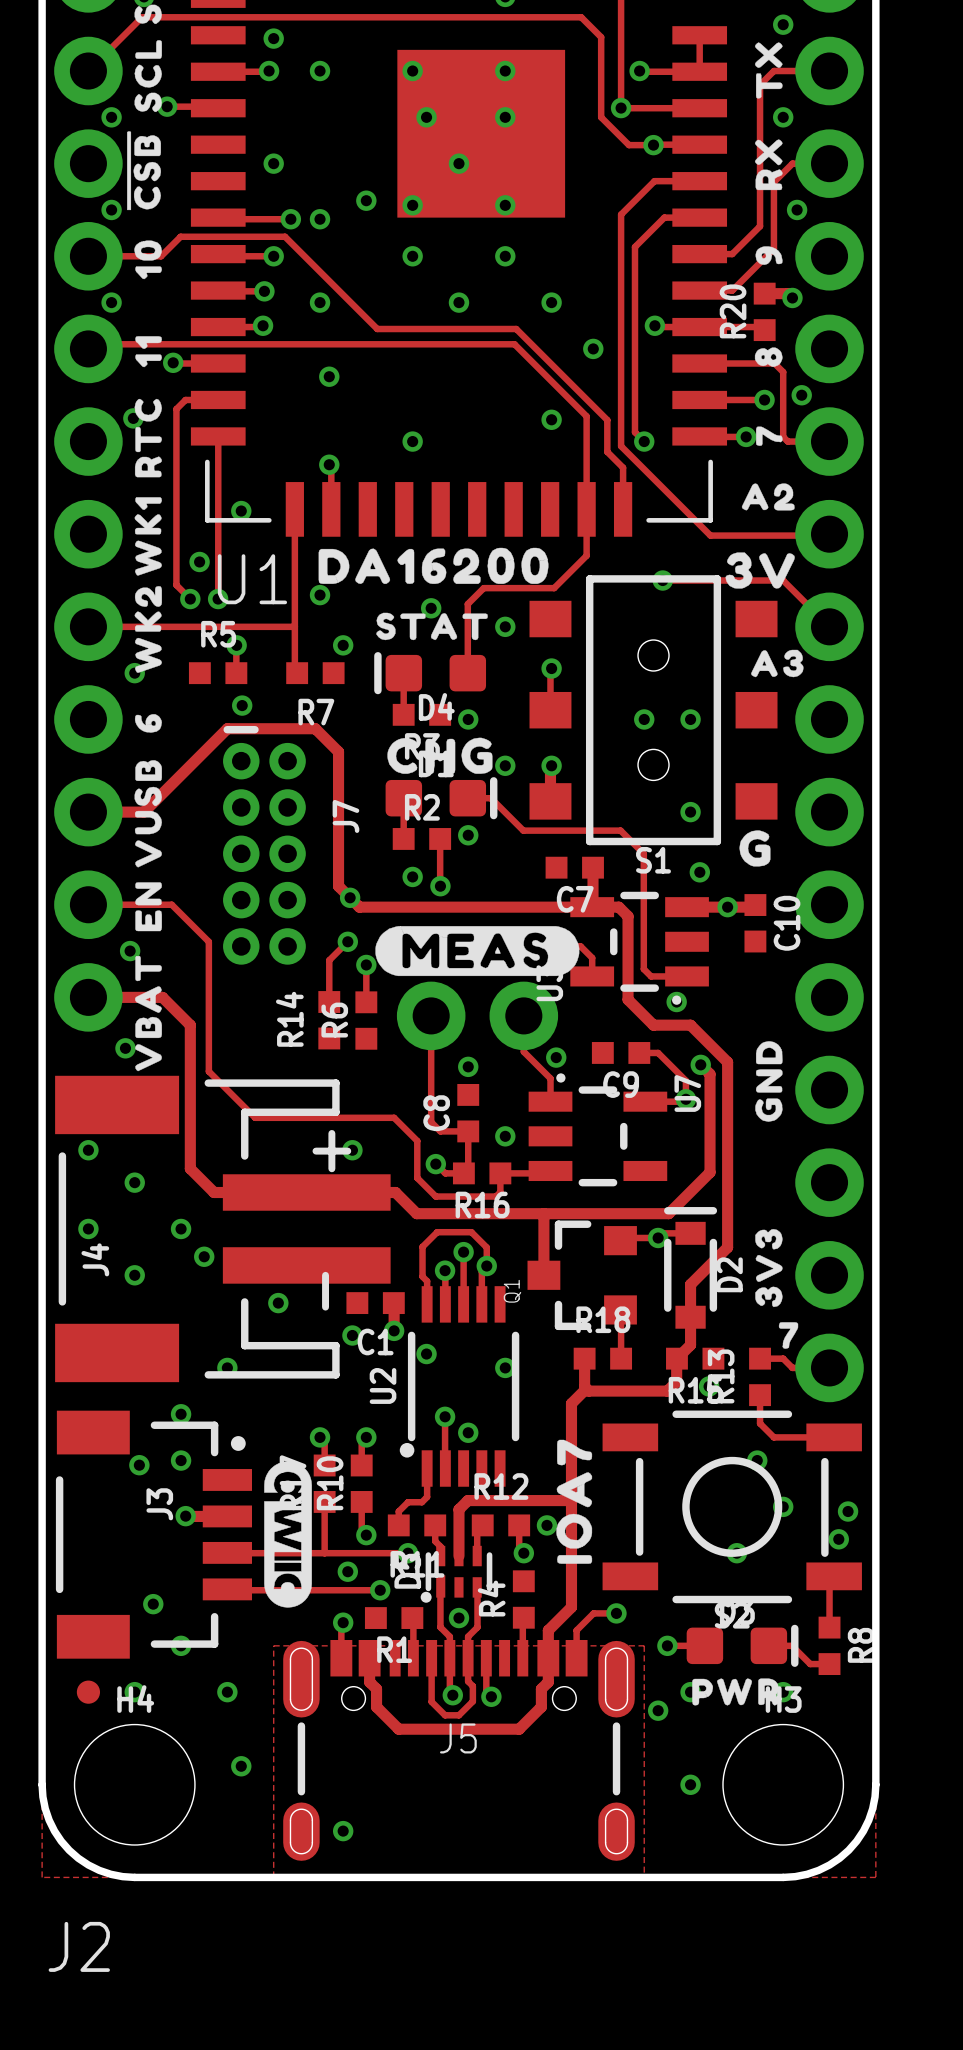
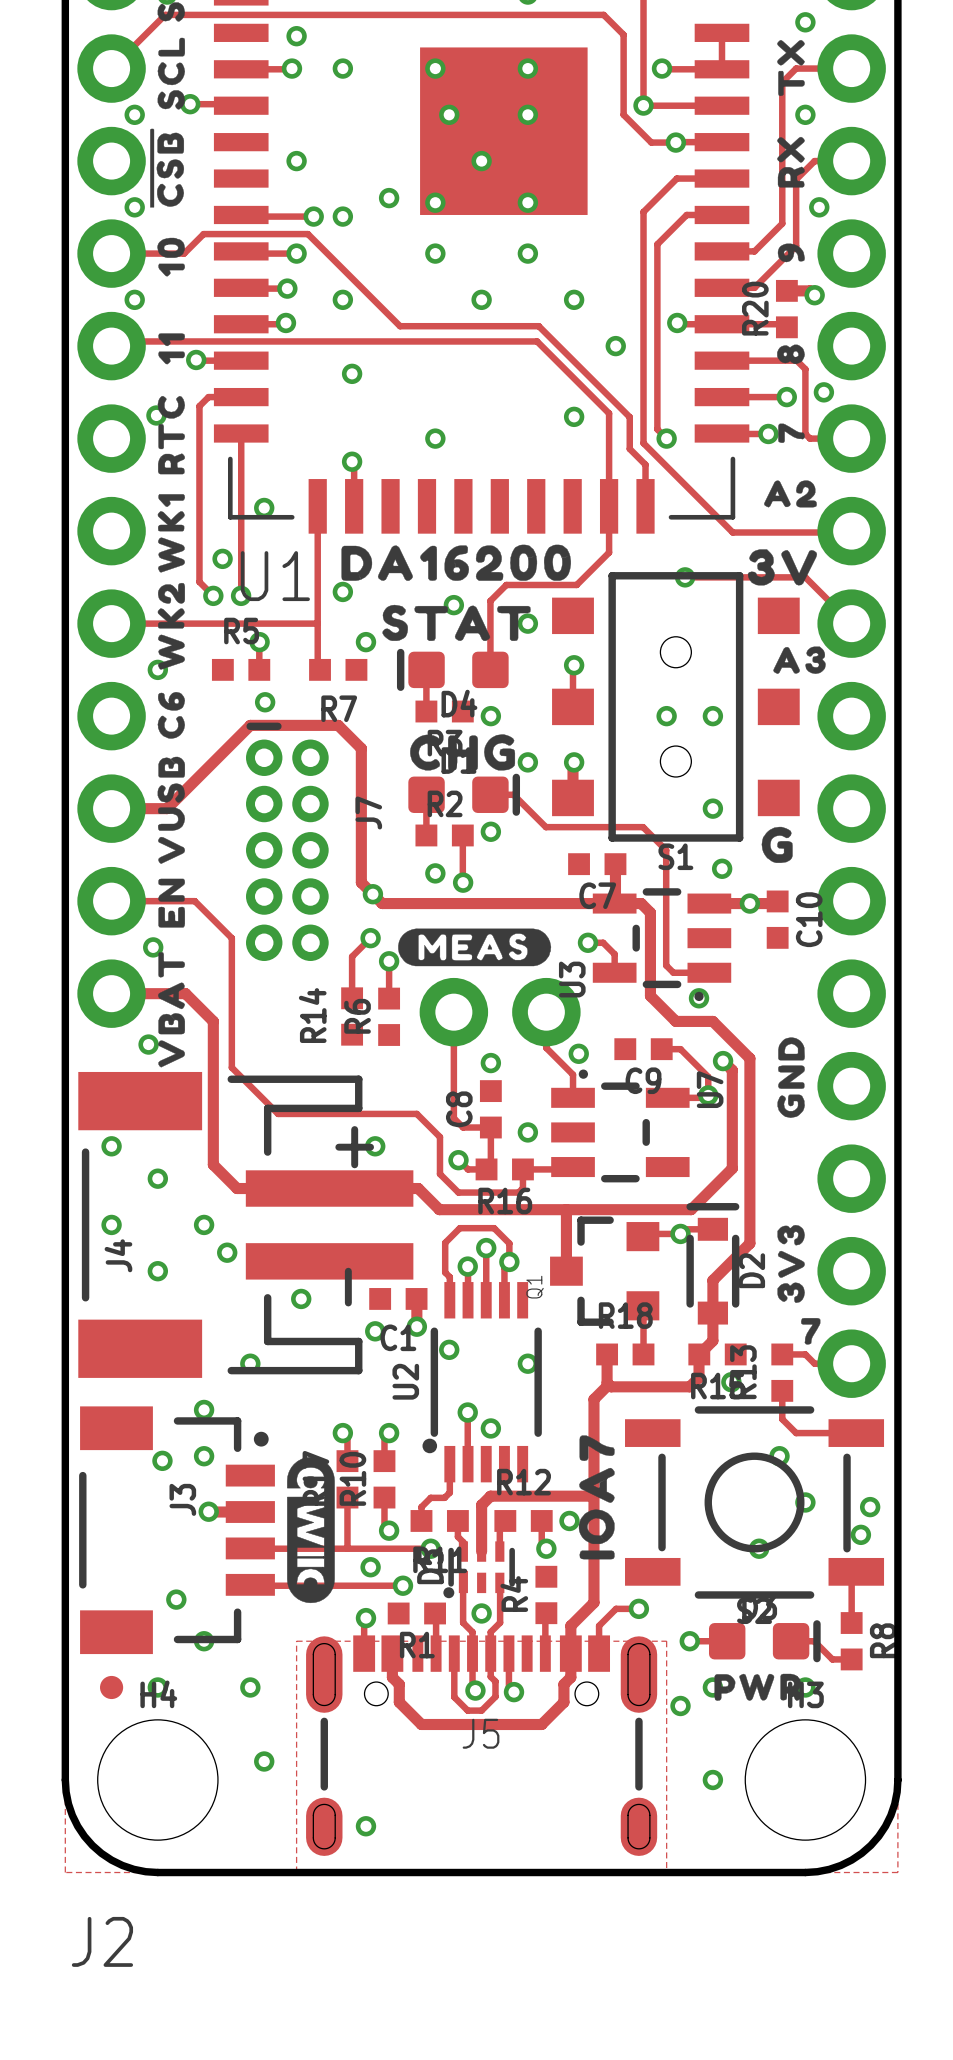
drawing shape: [376, 612, 488, 641] -> [382, 604, 531, 641]
drawing shape: [134, 714, 162, 733] -> [157, 692, 186, 739]
drawing shape: [375, 926, 580, 977] -> [398, 928, 552, 967]

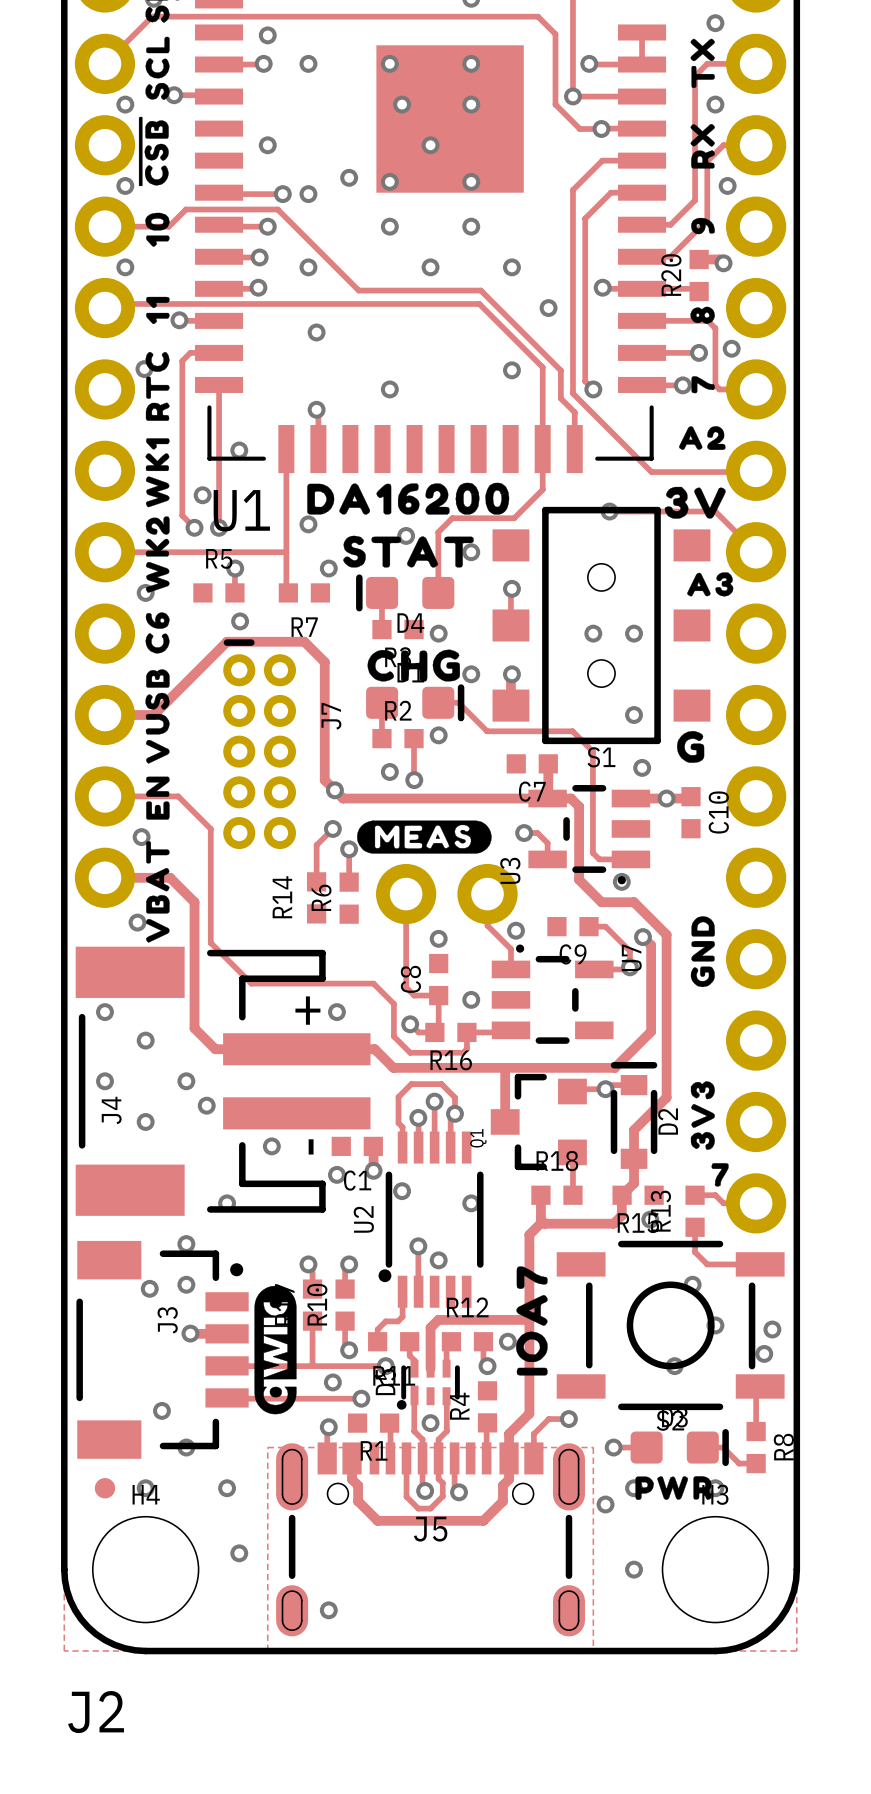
drawing shape: [287, 1456, 335, 1604] -> [254, 1285, 297, 1415]

